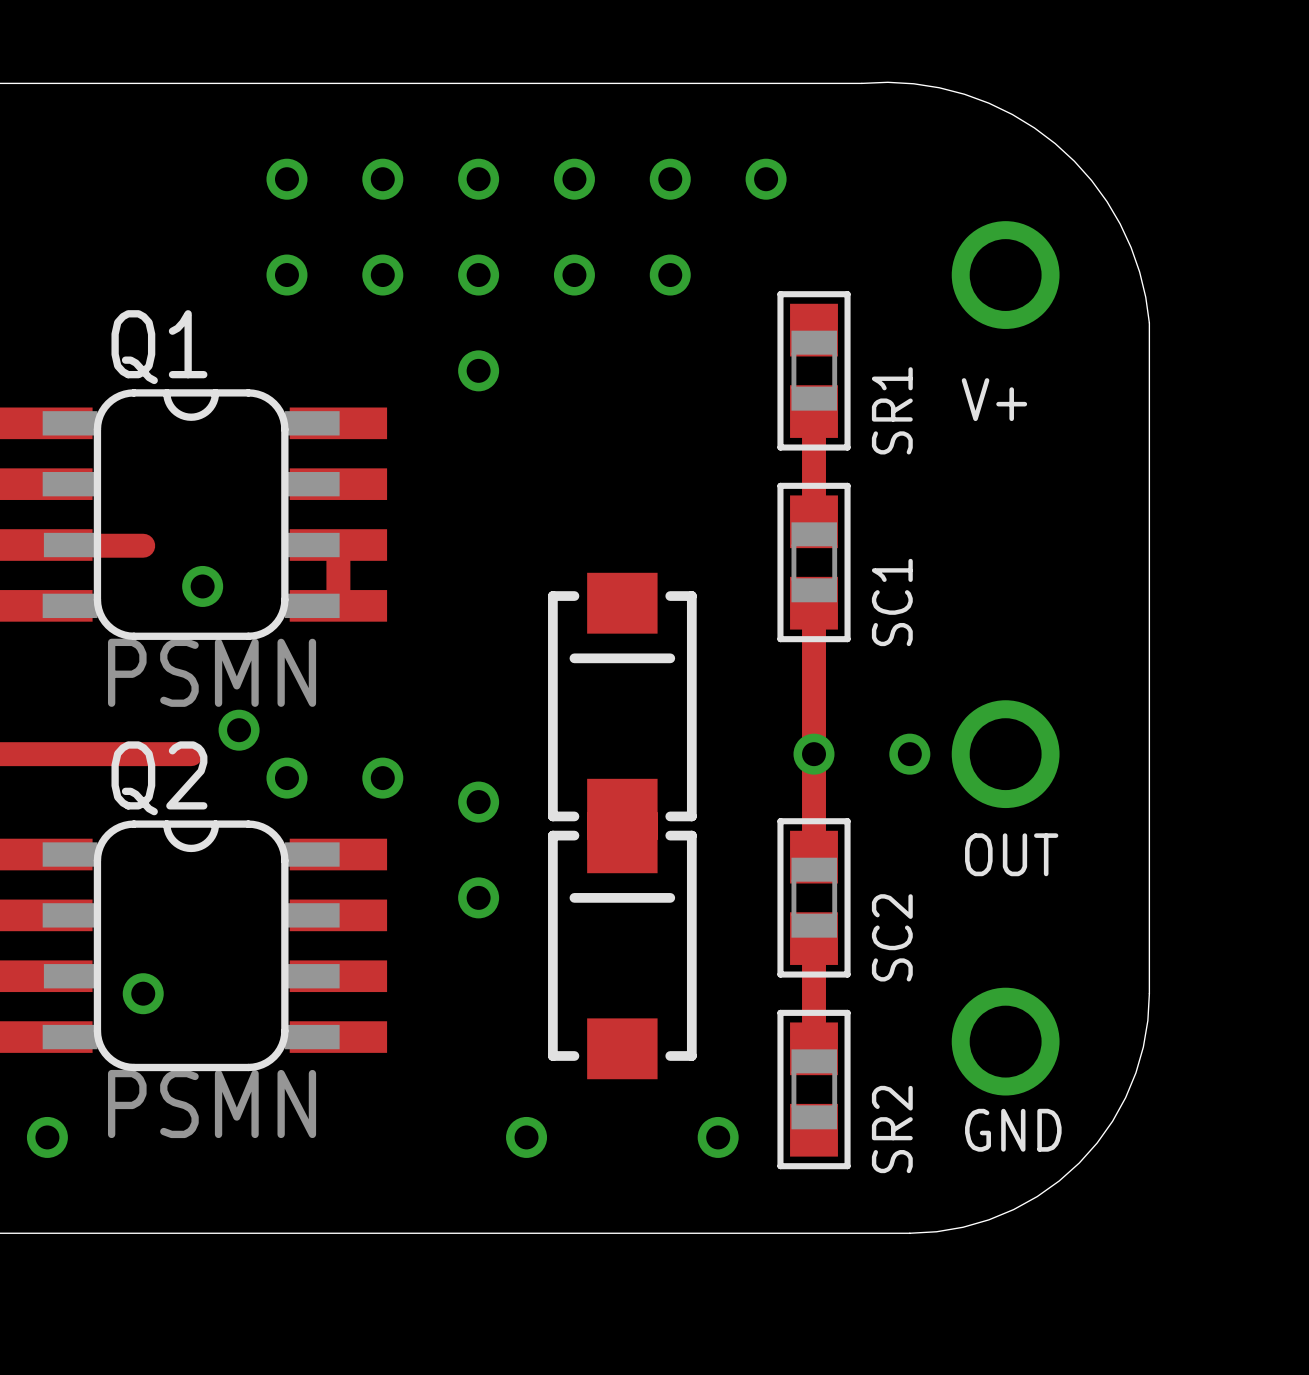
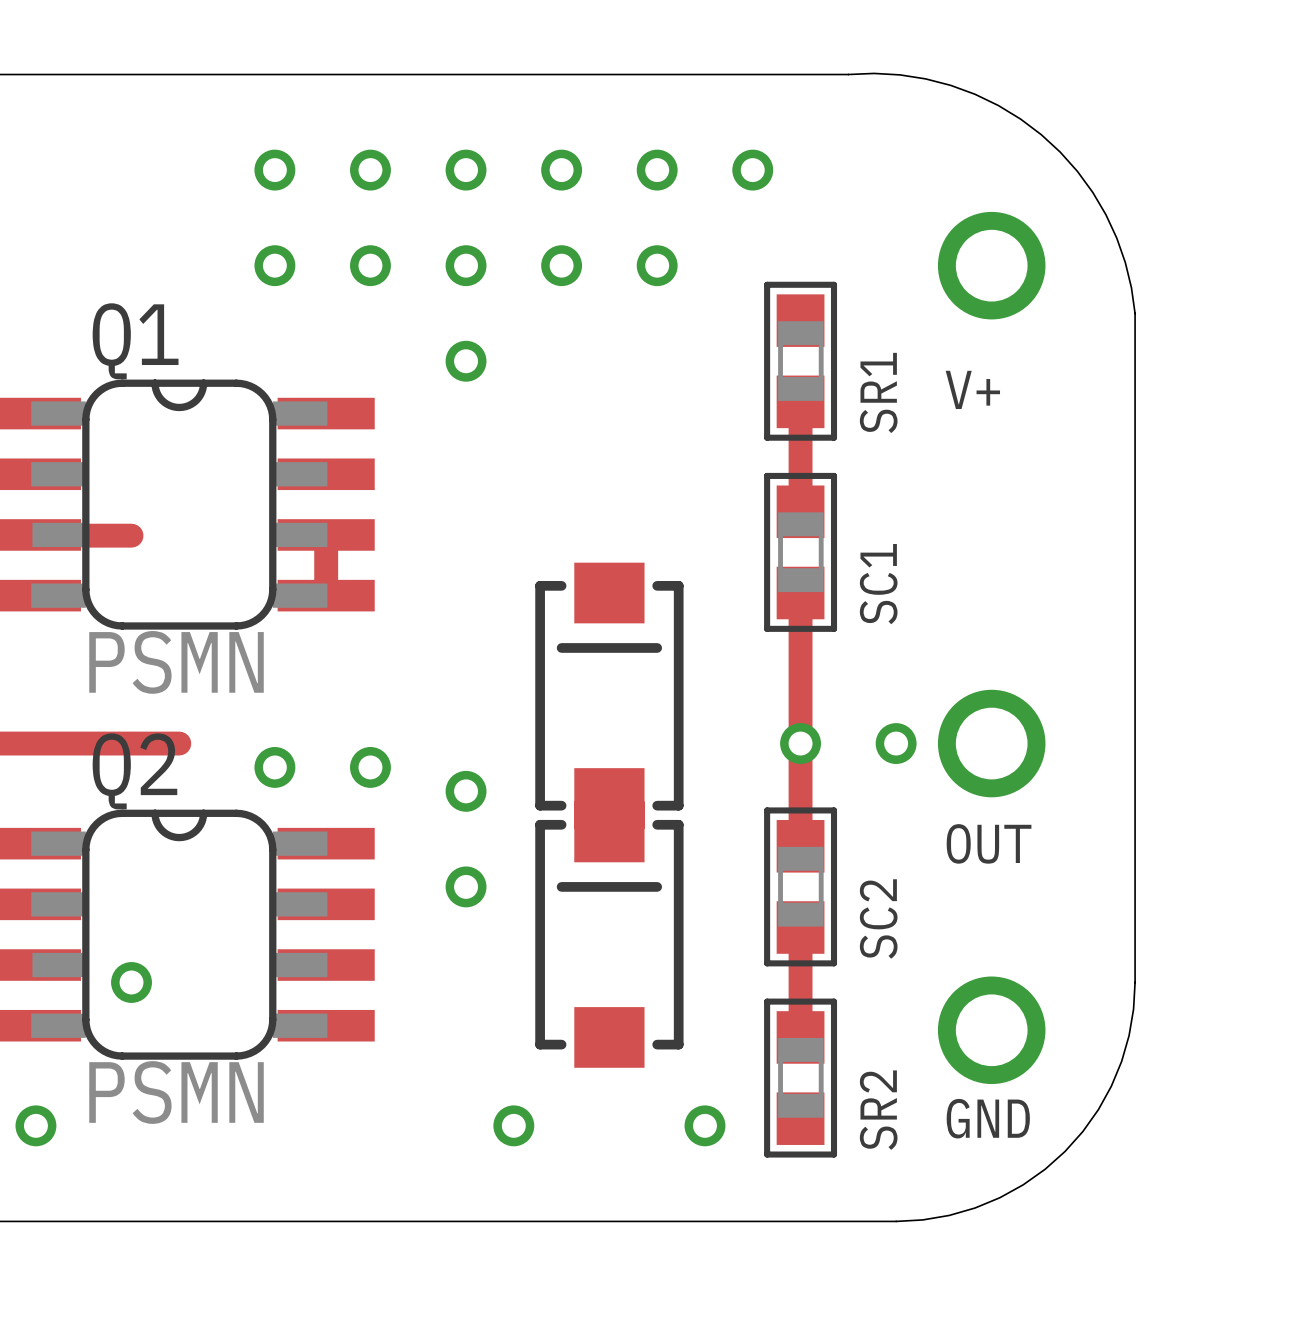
via: (202, 586) -> none
via: (239, 730) -> none

